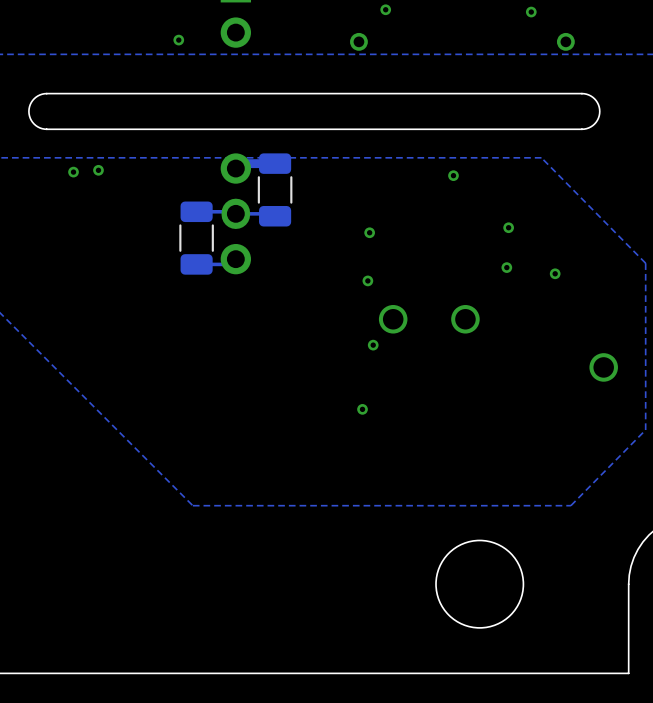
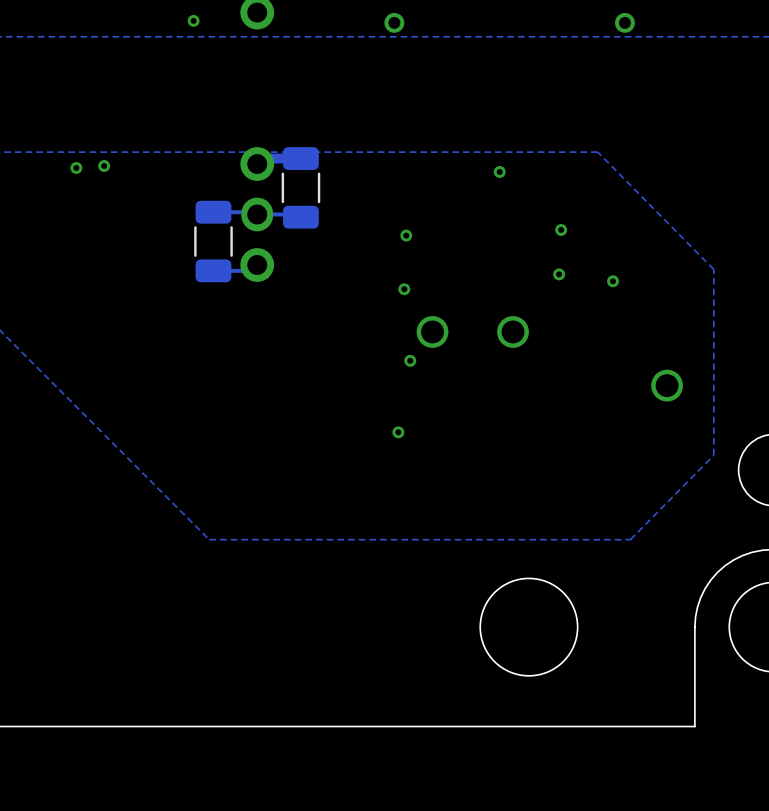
board edge: (581, 93) (46, 93) (34, 98) (28, 111) (34, 124) (46, 129) (581, 129) (594, 124) (599, 111) (594, 98) (581, 93) -> none

